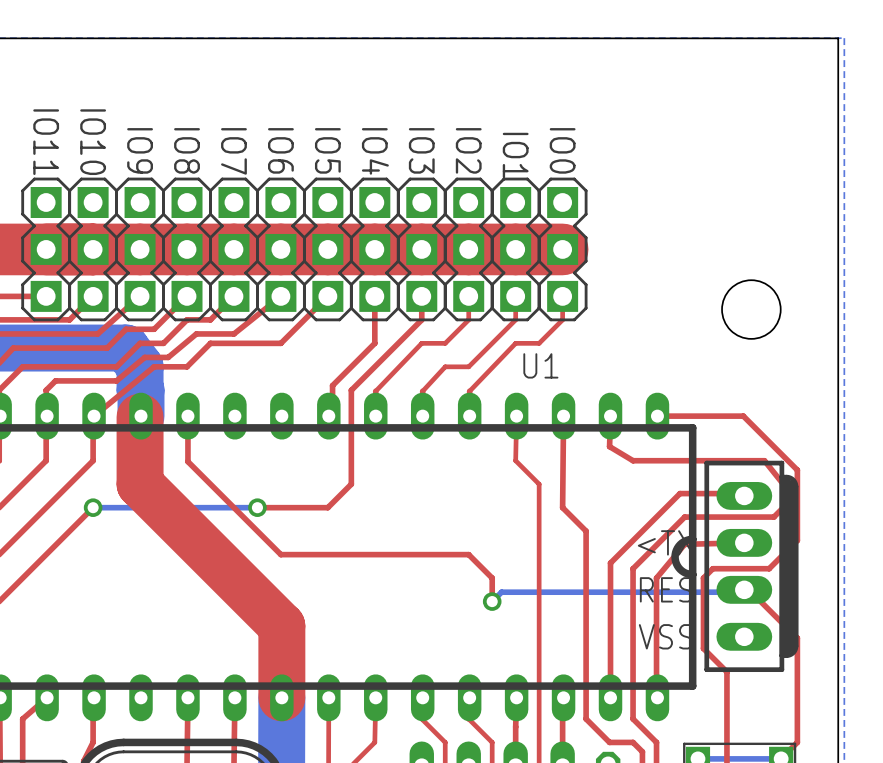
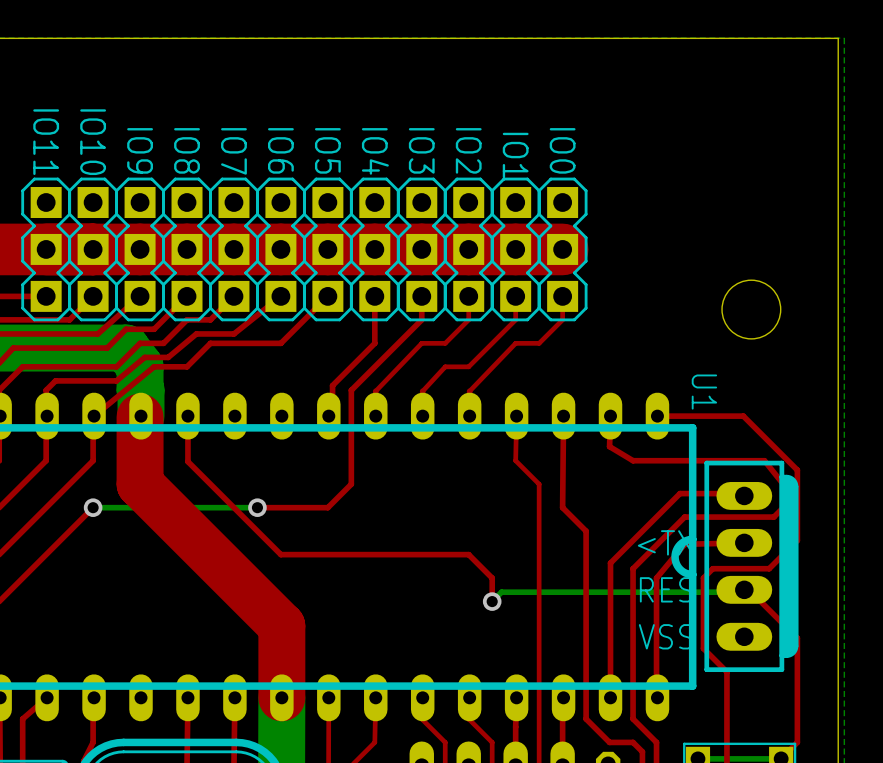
U1 name rotation: 0° (540, 365) -> 90° clockwise (704, 392)
U1 name position: U1 (540, 365) -> U1 (704, 392)

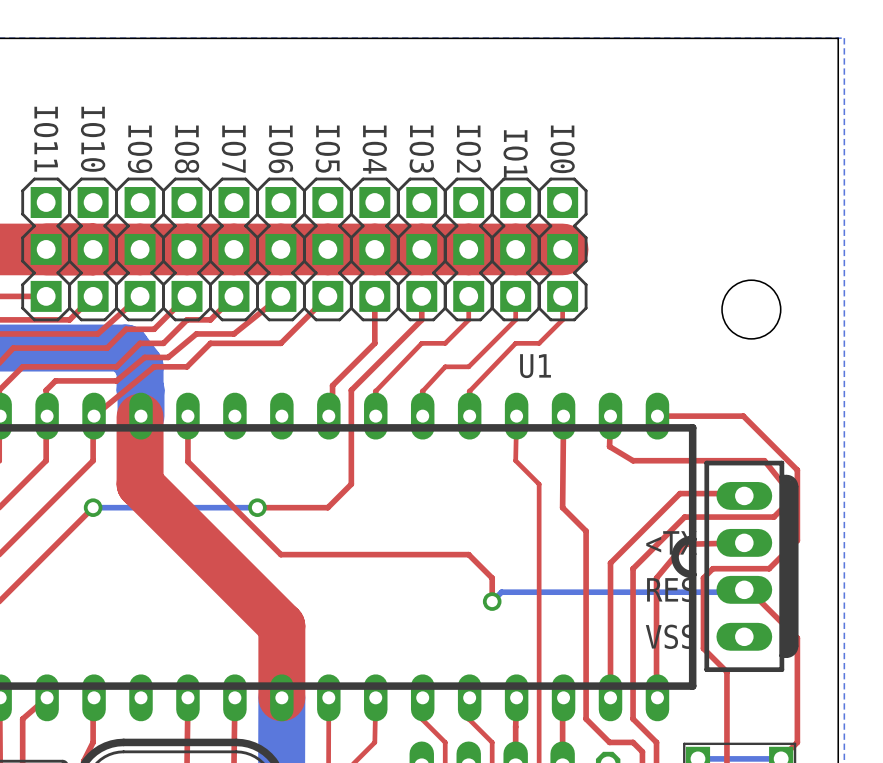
U1 name rotation: 0° (704, 392) -> 90° counterclockwise (535, 366)
U1 name position: U1 (704, 392) -> U1 (535, 366)

